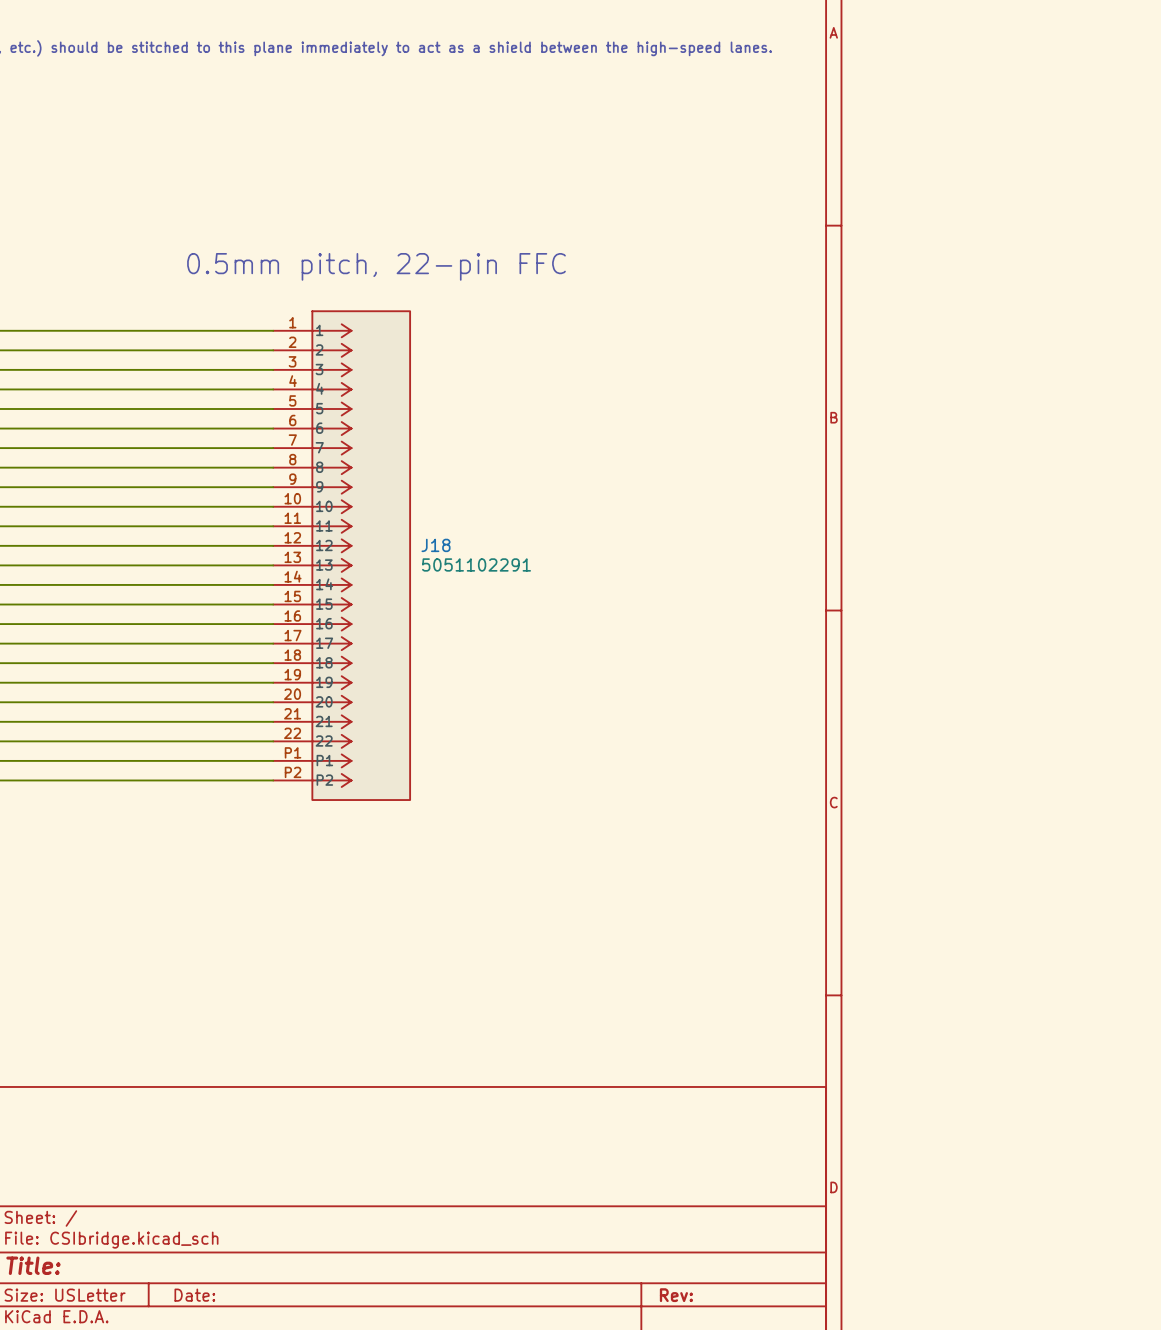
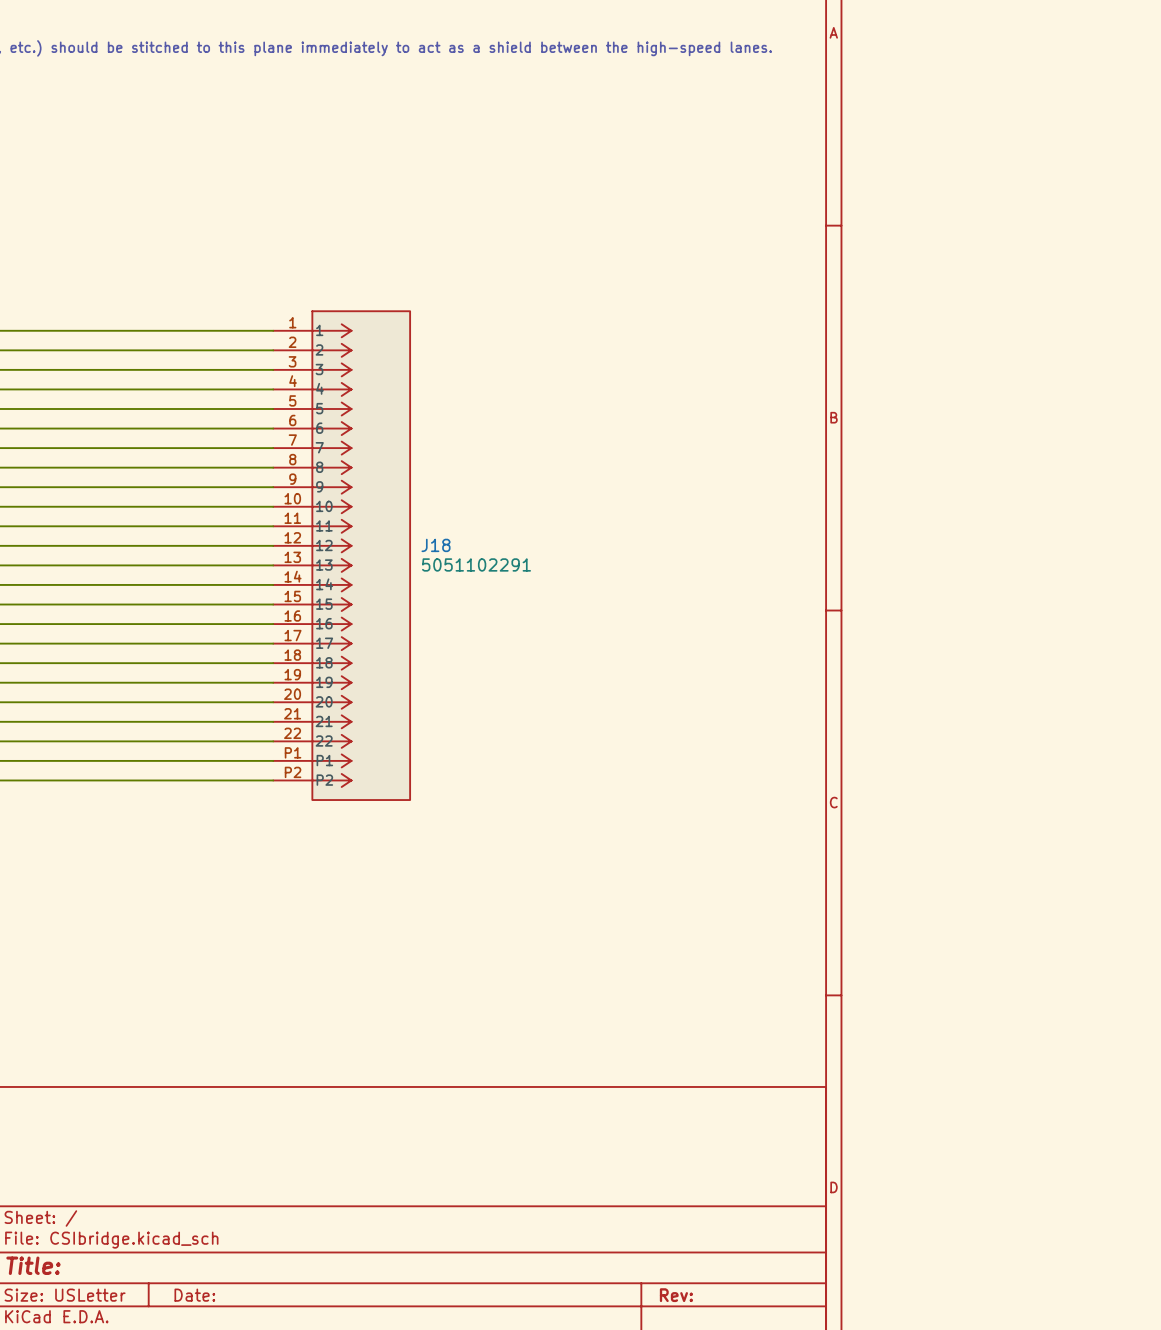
text: 0.5mm pitch, 22-pin FFC (376, 266) -> none

